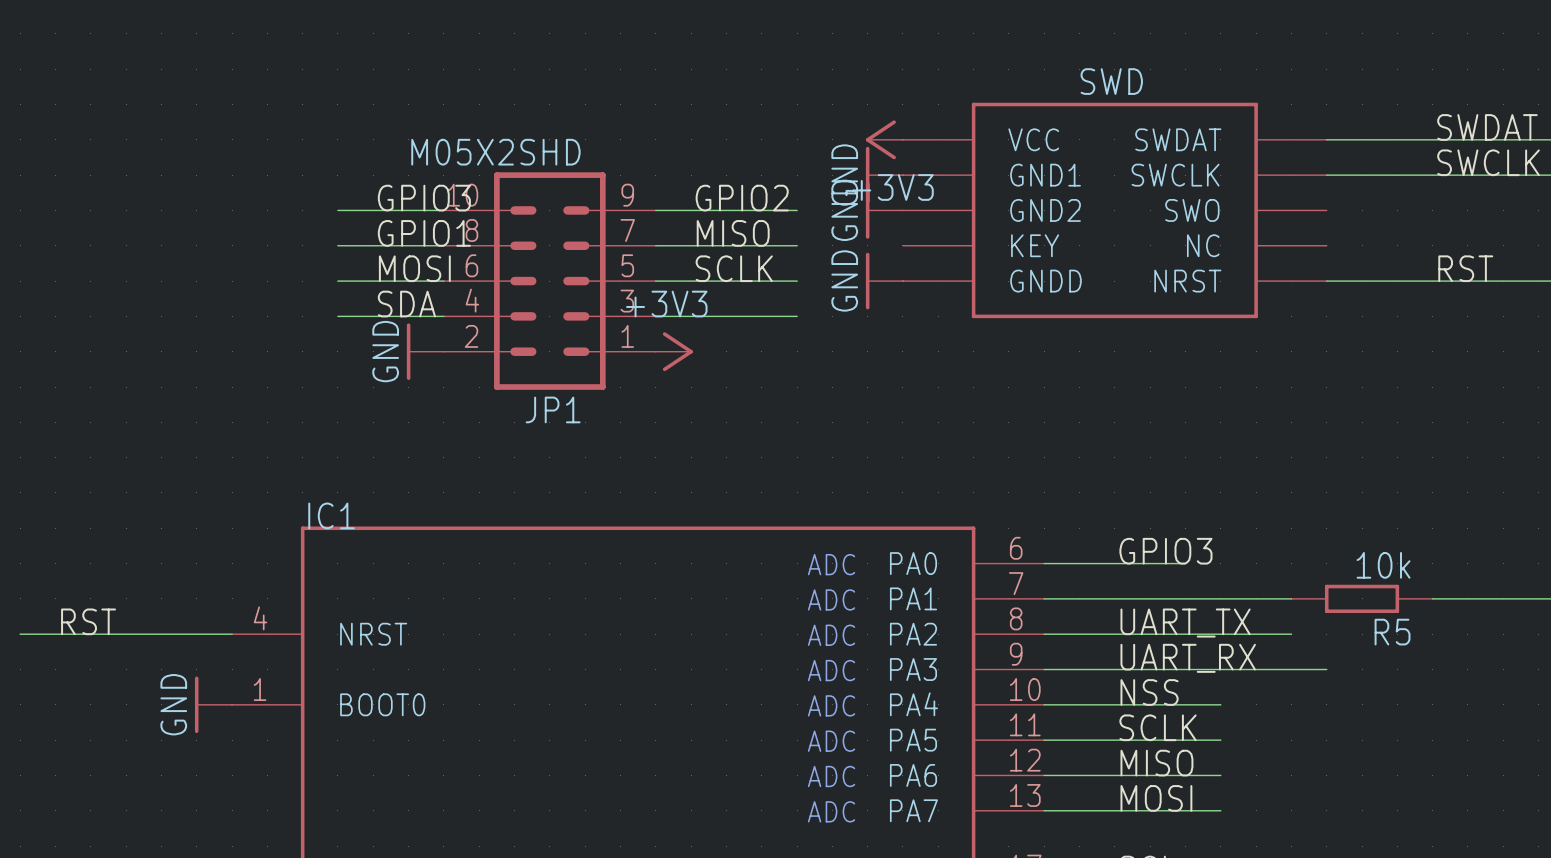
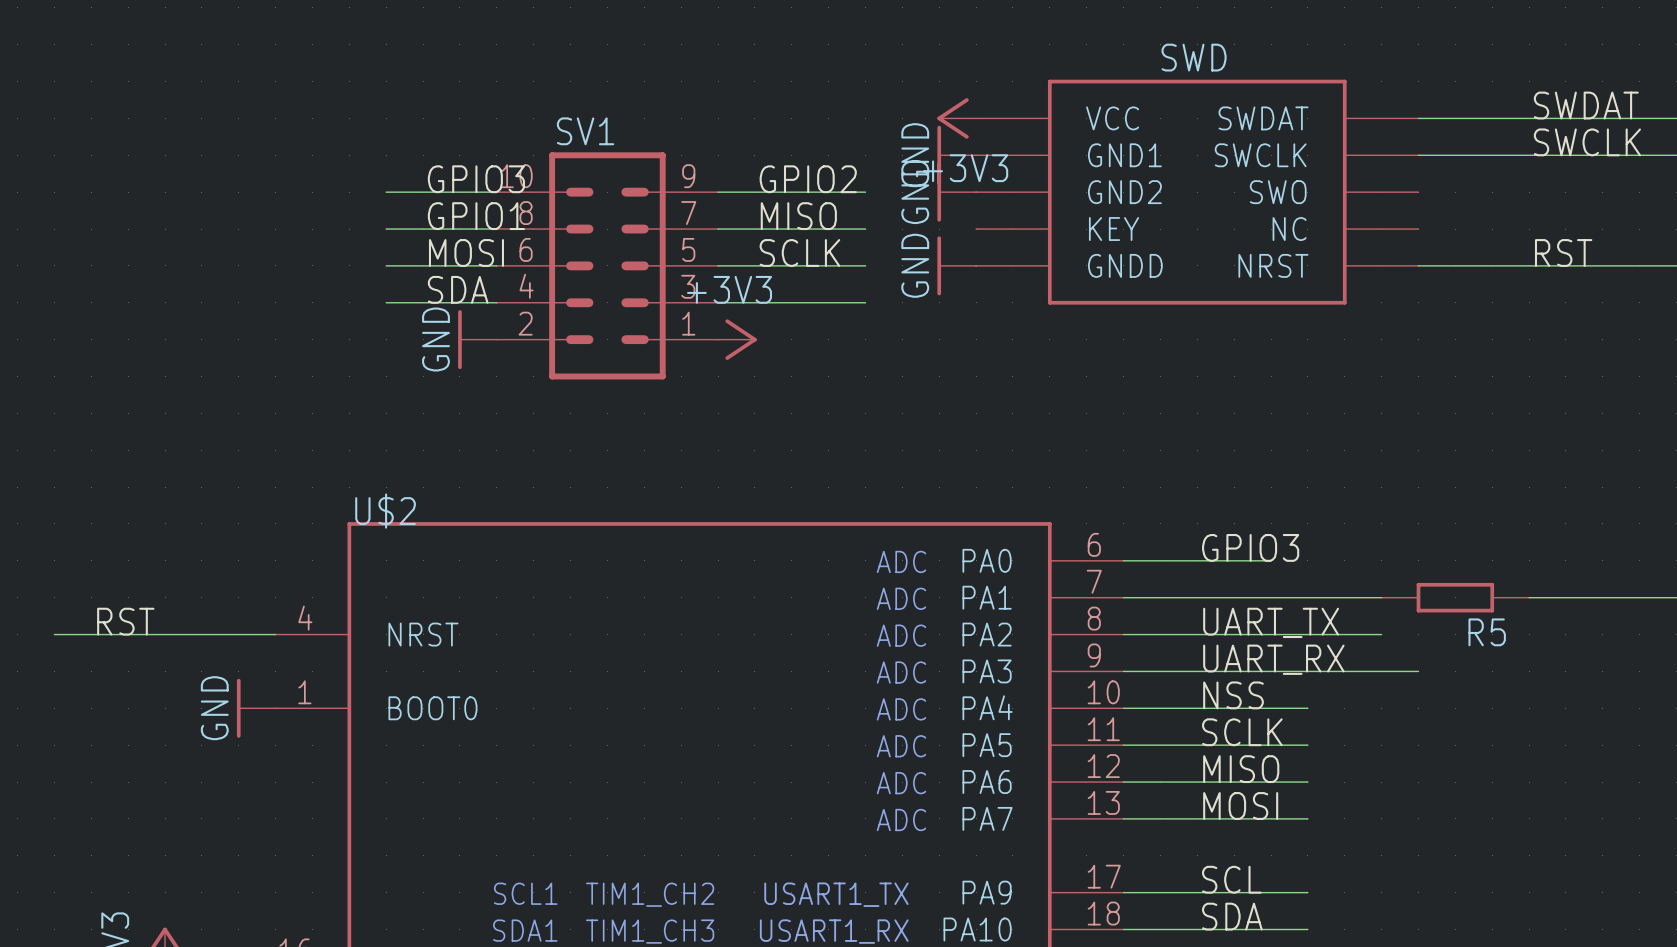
JP1 value: M05X2SHD (495, 152) -> none
JP1 name: JP1 (553, 409) -> SV1 (585, 131)
IC1 name: IC1 (331, 515) -> U$2 (385, 511)
R5 value: 10k (1383, 565) -> none

